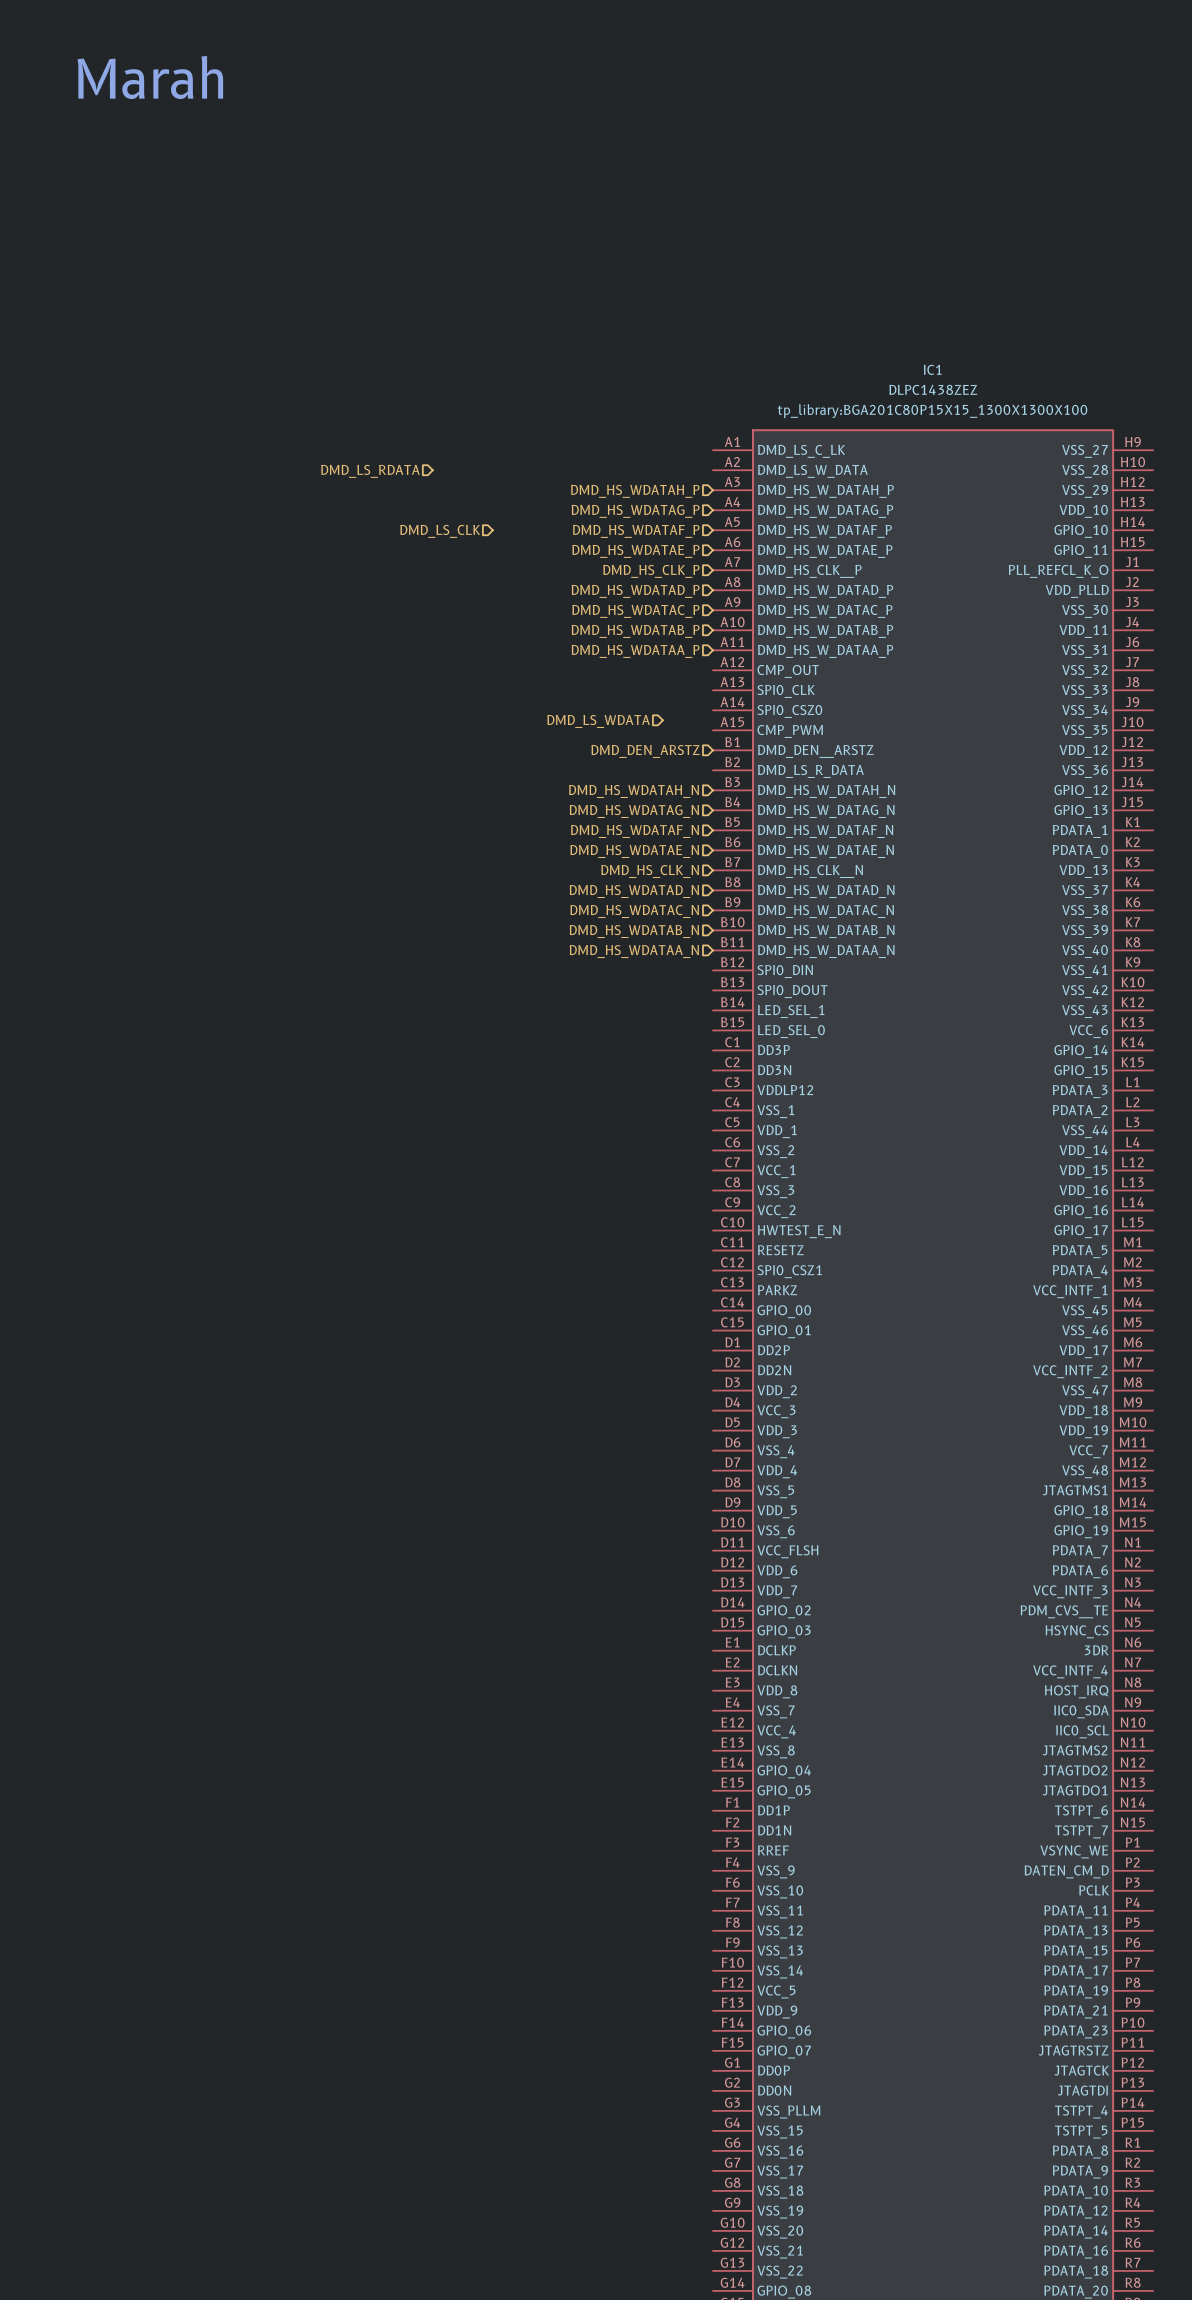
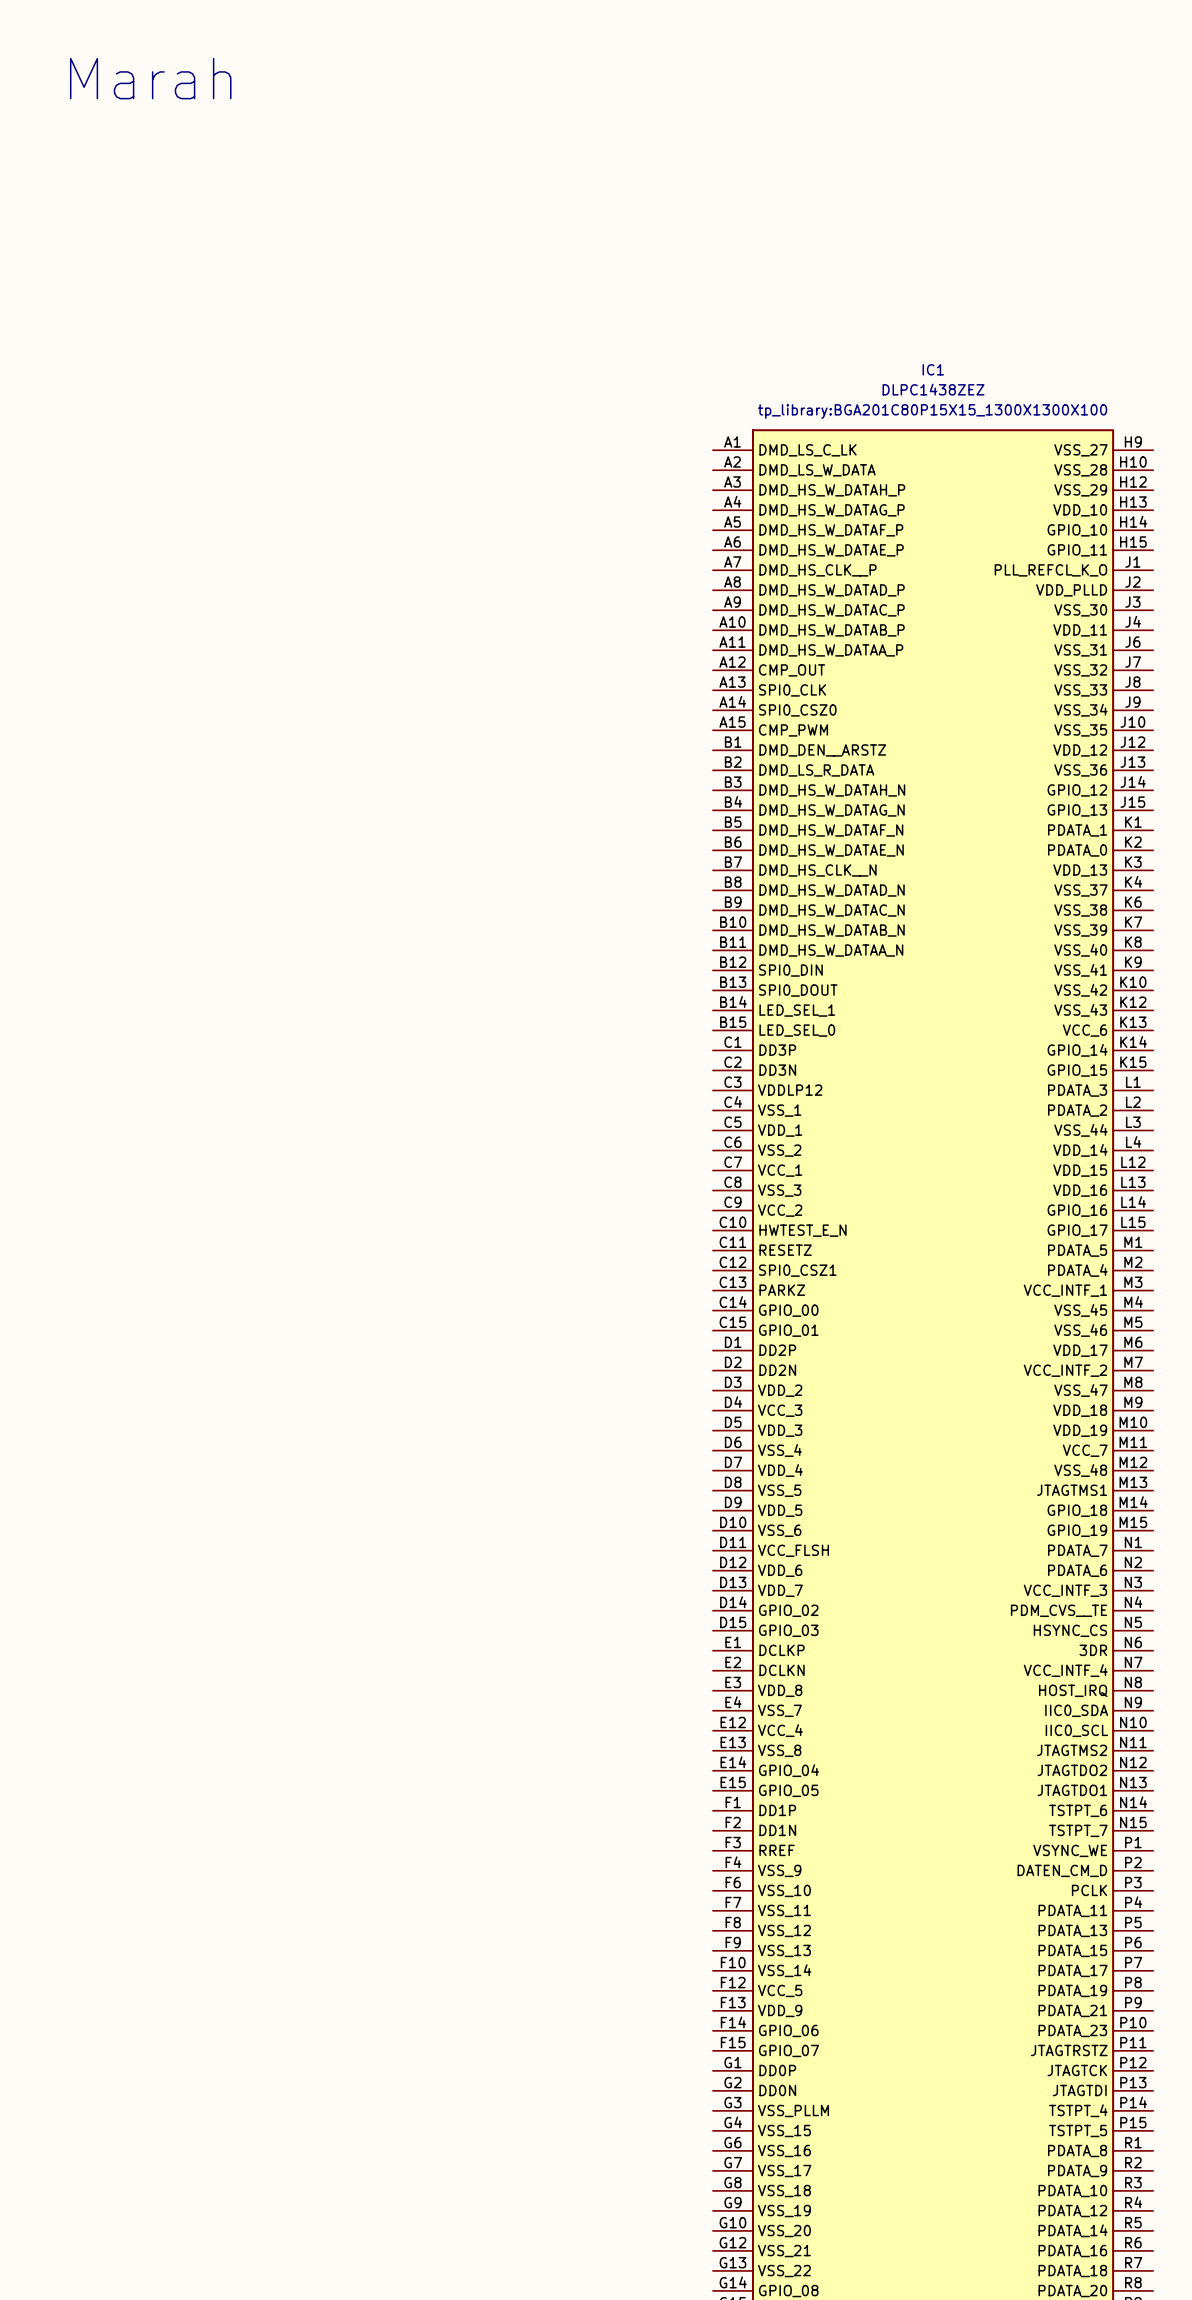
hierarchical label: DMD_LS_RDATA (370, 471) -> none
hierarchical label: DMD_HS_WDATAH_P (635, 491) -> none
hierarchical label: DMD_HS_WDATAG_P (635, 511) -> none
hierarchical label: DMD_LS_CLK (440, 531) -> none
hierarchical label: DMD_HS_WDATAF_P (636, 531) -> none
hierarchical label: DMD_HS_WDATAE_P (635, 551) -> none
hierarchical label: DMD_HS_CLK_P (651, 571) -> none
hierarchical label: DMD_HS_WDATAD_P (635, 591) -> none
hierarchical label: DMD_HS_WDATAC_P (635, 611) -> none
hierarchical label: DMD_HS_WDATAB_P (635, 631) -> none
hierarchical label: DMD_HS_WDATAA_P (635, 651) -> none
hierarchical label: DMD_LS_WDATA (598, 721) -> none
hierarchical label: DMD_DEN_ARSTZ (645, 751) -> none
hierarchical label: DMD_HS_WDATAH_N (633, 791) -> none
hierarchical label: DMD_HS_WDATAG_N (634, 811) -> none
hierarchical label: DMD_HS_WDATAF_N (634, 831) -> none
hierarchical label: DMD_HS_WDATAE_N (634, 851) -> none
hierarchical label: DMD_HS_CLK_N (650, 871) -> none
hierarchical label: DMD_HS_WDATAD_N (634, 891) -> none
hierarchical label: DMD_HS_WDATAC_N (634, 911) -> none
hierarchical label: DMD_HS_WDATAB_N (634, 931) -> none
hierarchical label: DMD_HS_WDATAA_N (634, 951) -> none

